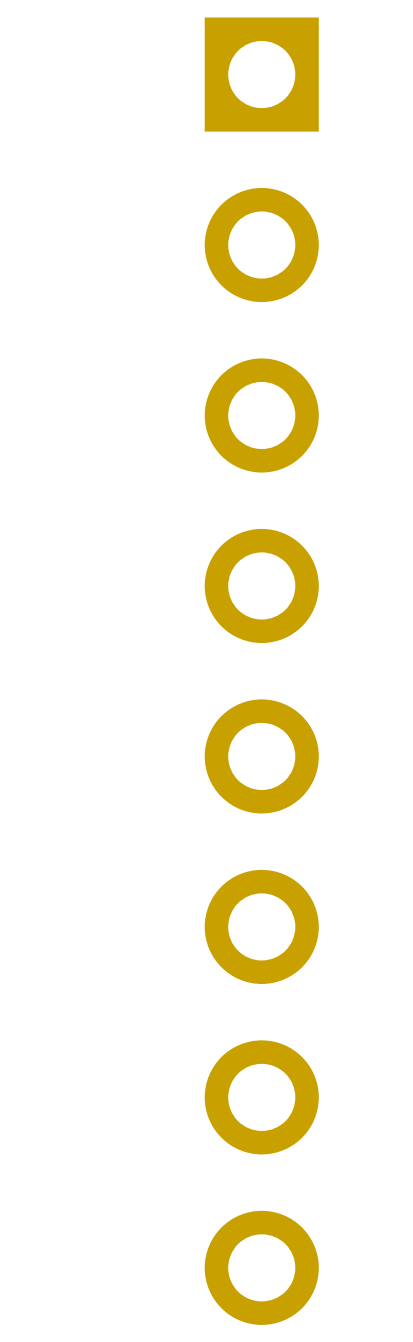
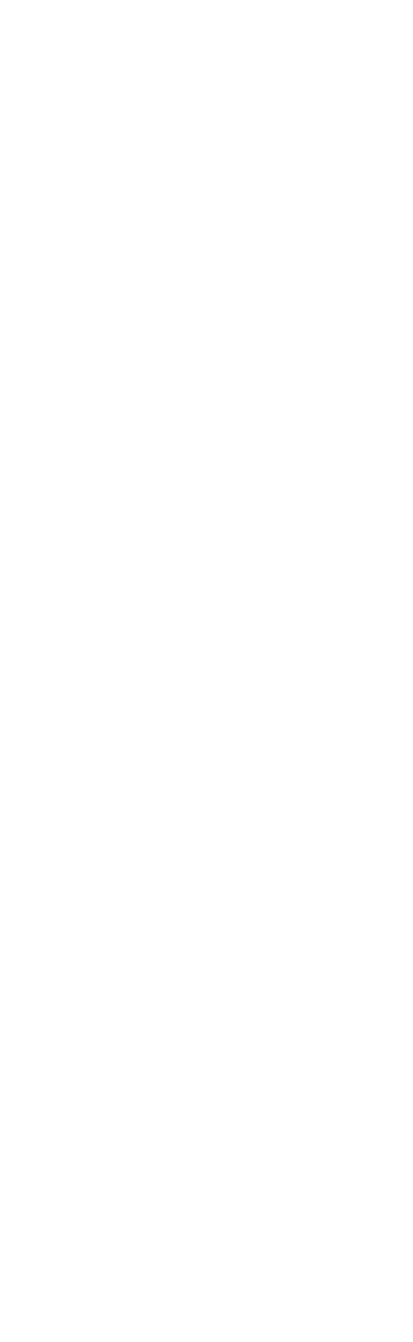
part: (261, 671) -> none

